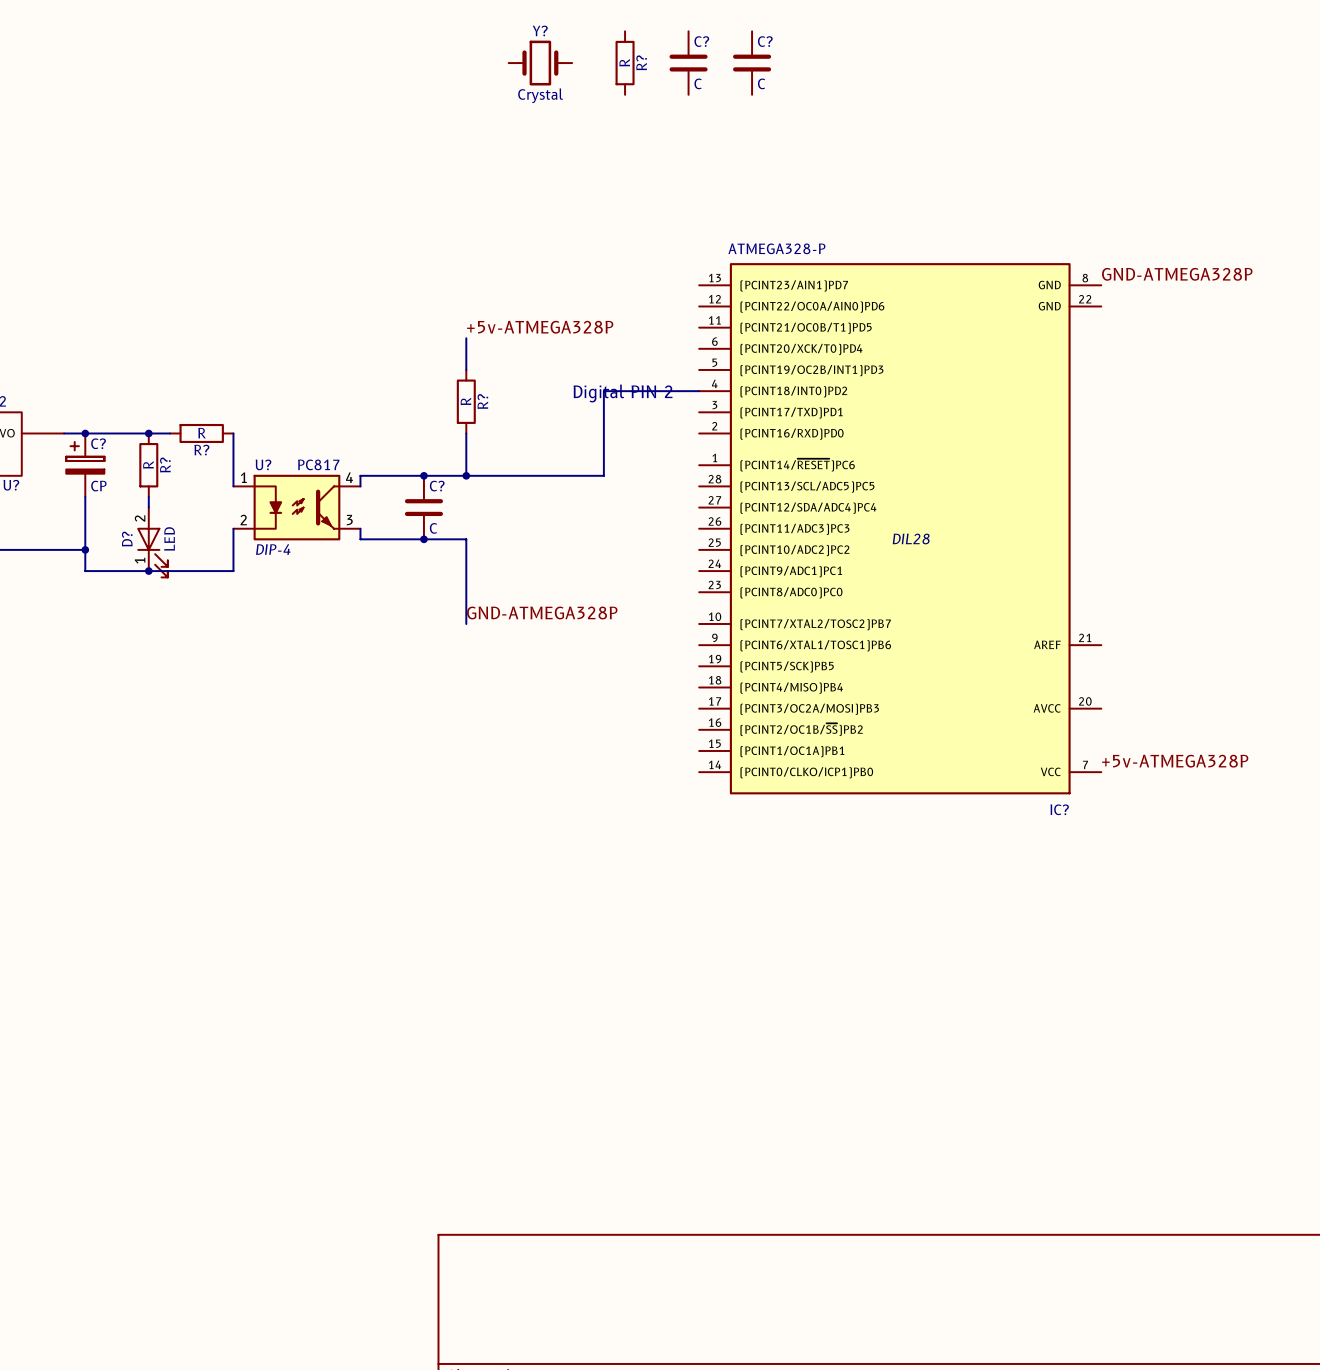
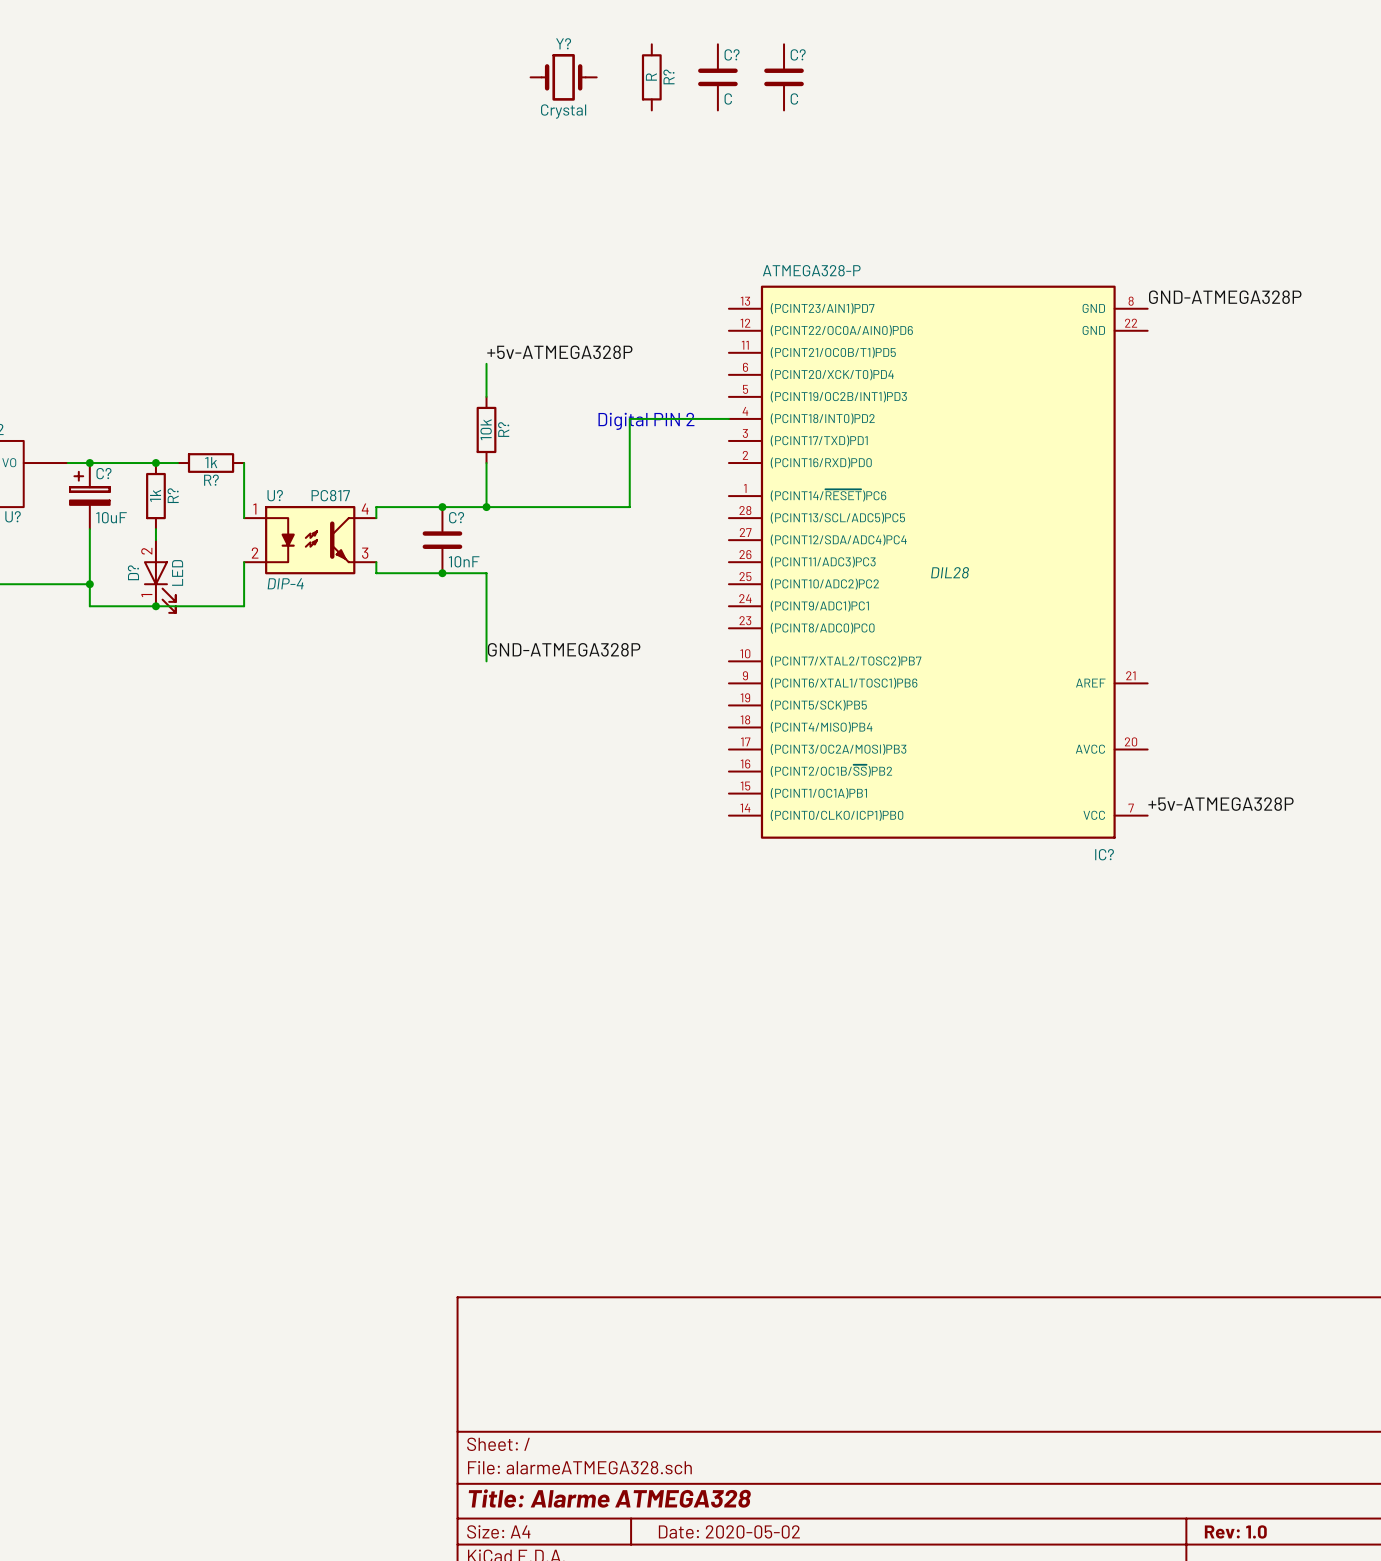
R? value: R (465, 401) -> 10k (486, 429)
R? value: R (202, 433) -> 1k (211, 462)
R? value: R (148, 464) -> 1k (155, 495)
C? value: CP (98, 486) -> 10uF (111, 517)
C? value: C (433, 528) -> 10nF (464, 561)

